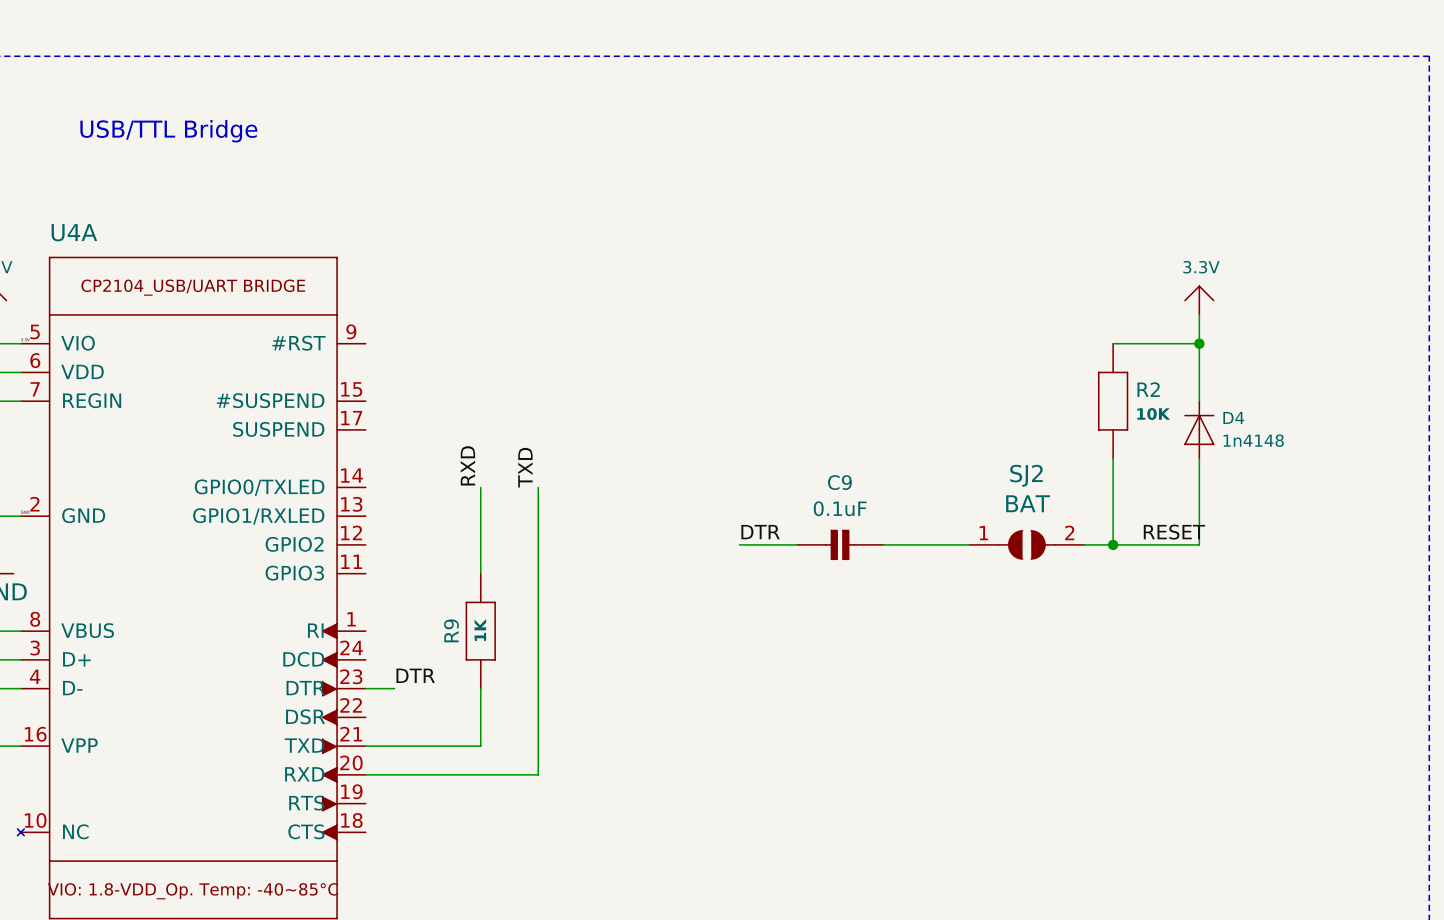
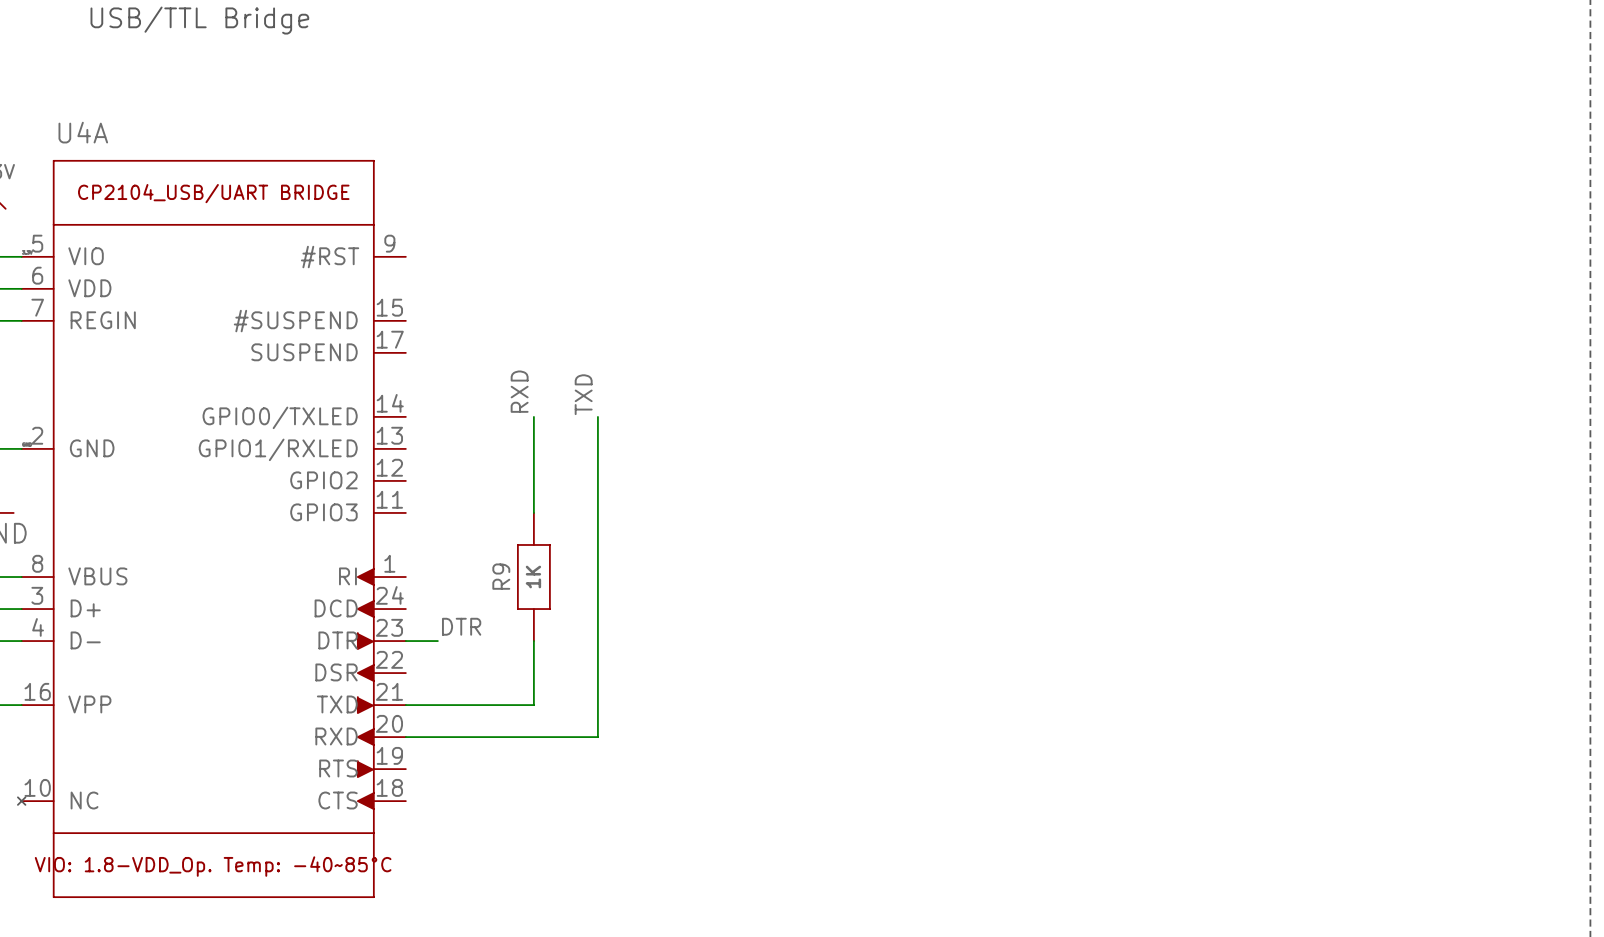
power symbol: 3.3V (1199, 300) -> none
wire: (1199, 314) (1199, 401) -> none
wire: (1113, 343) (1199, 343) -> none
junction: (1199, 343) -> none
R2: 10K (1113, 401) -> none
D4: 1n4148 (1199, 429) -> none
wire: (1113, 458) (1113, 544) -> none
wire: (1199, 458) (1199, 544) (1084, 544) -> none
label: DTR (760, 532) -> none
label: RESET (1174, 532) -> none
wire: (739, 544) (796, 544) -> none
C9: 0.1uF (840, 544) -> none
wire: (883, 544) (969, 544) -> none
SJ2: BAT (1026, 544) -> none
junction: (1113, 544) -> none

